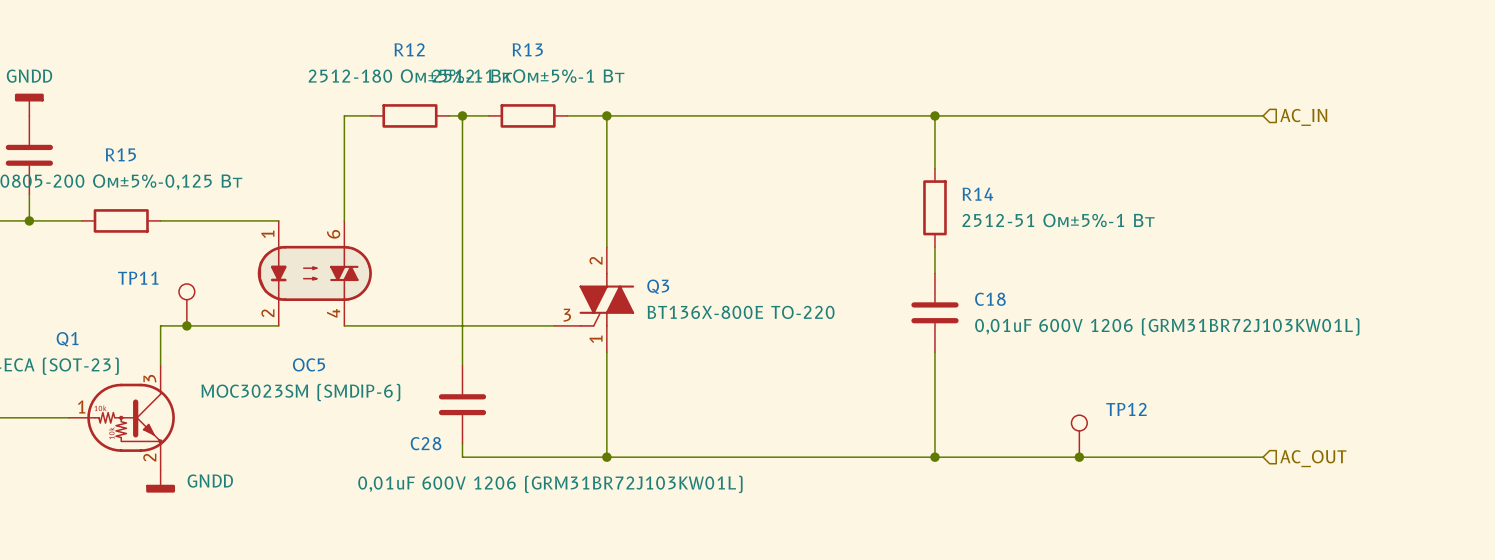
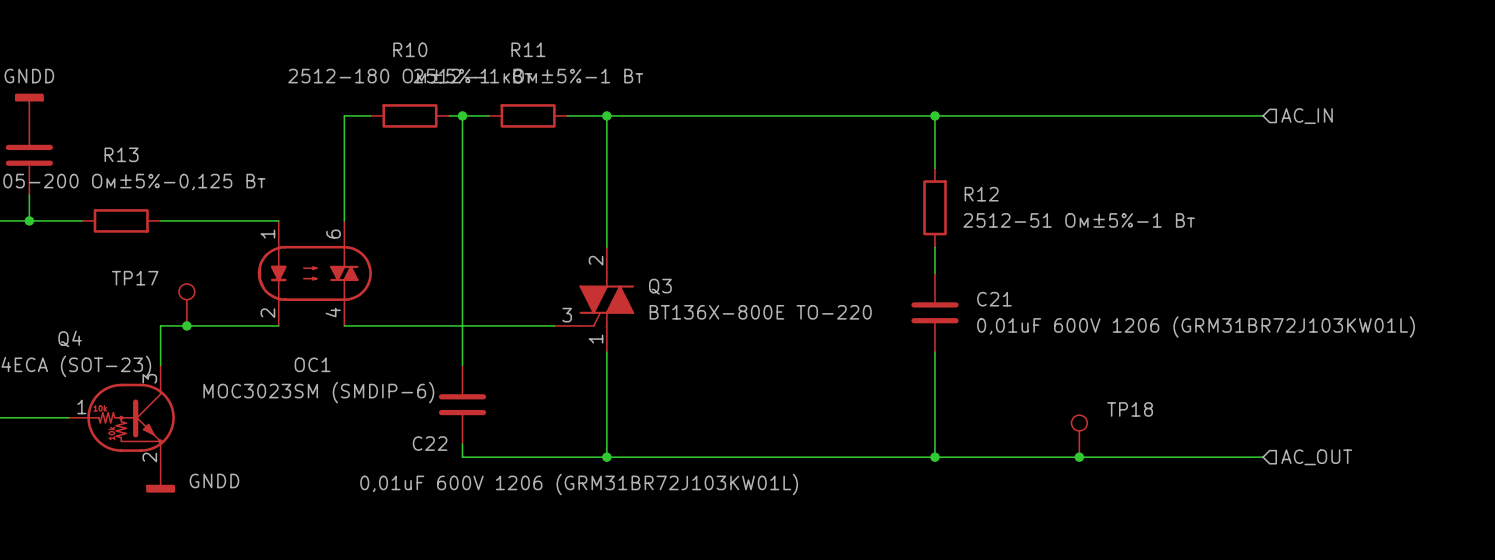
R12 name: R12 (409, 49) -> R10 (410, 49)
R13 name: R13 (527, 49) -> R11 (528, 49)
R15 name: R15 (120, 154) -> R13 (121, 154)
R14 name: R14 (977, 194) -> R12 (981, 194)
TP11 name: TP11 (138, 278) -> TP17 (135, 278)
C18 name: C18 (990, 299) -> C21 (994, 299)
Q1 name: Q1 (67, 339) -> Q4 (70, 338)
OC5 name: OC5 (309, 364) -> OC1 (312, 364)
TP12 name: TP12 (1126, 409) -> TP18 (1130, 409)
C28 name: C28 (426, 443) -> C22 (430, 443)

